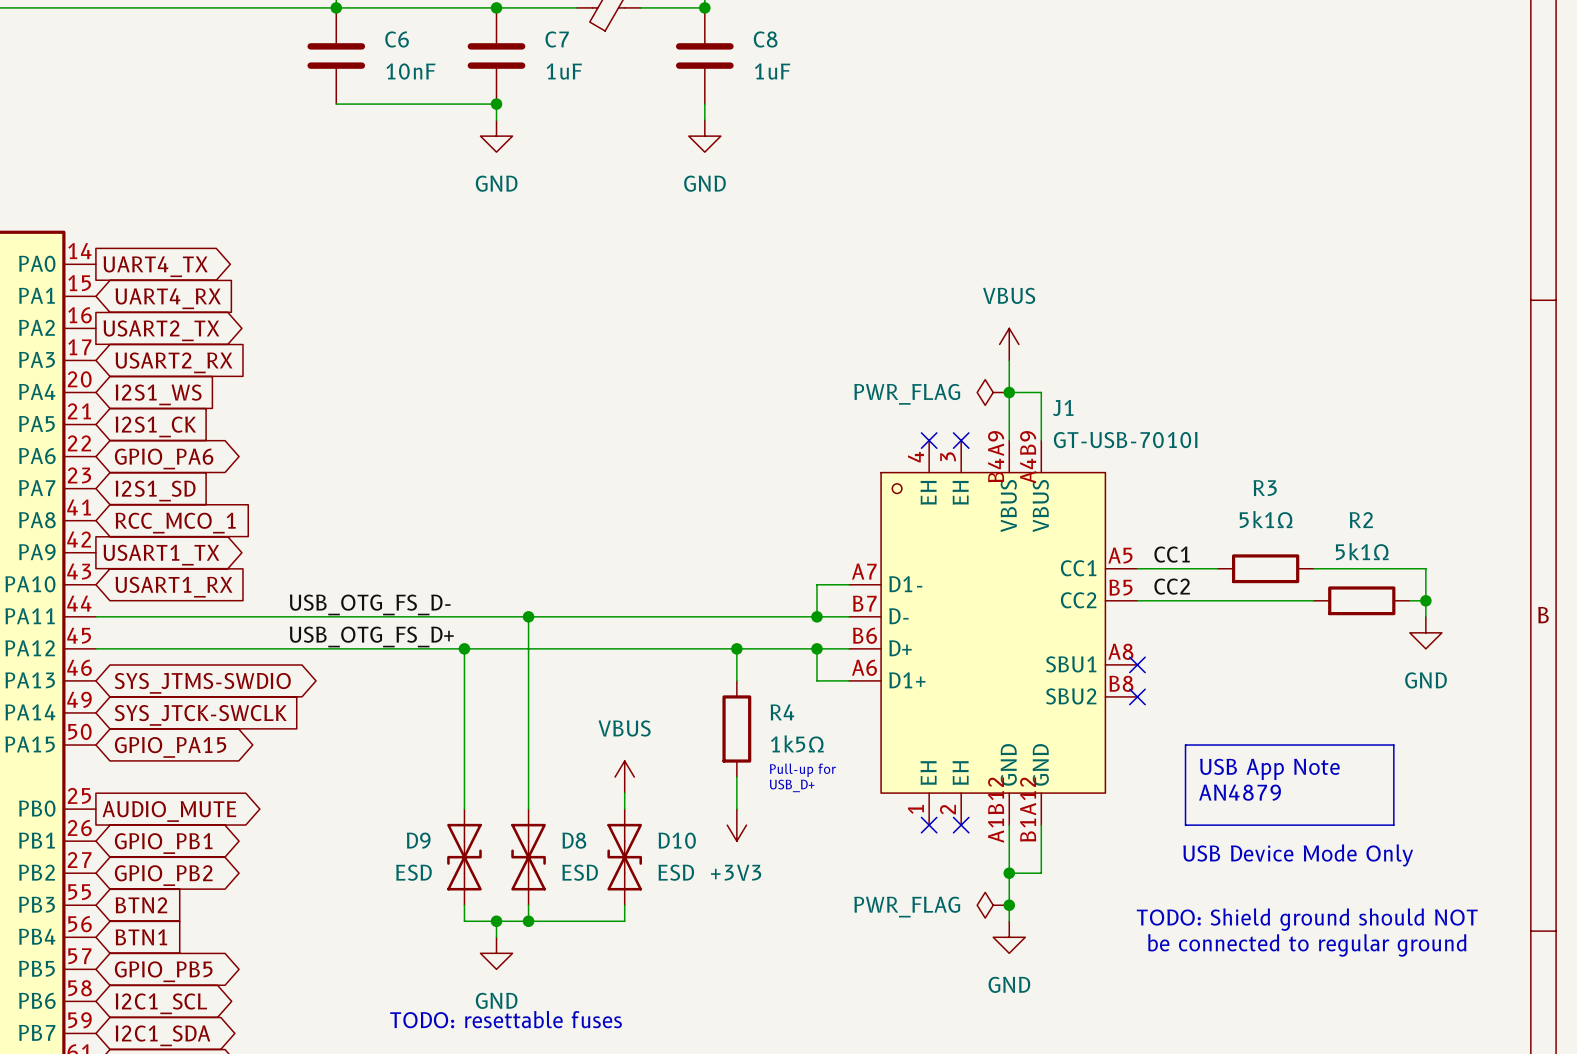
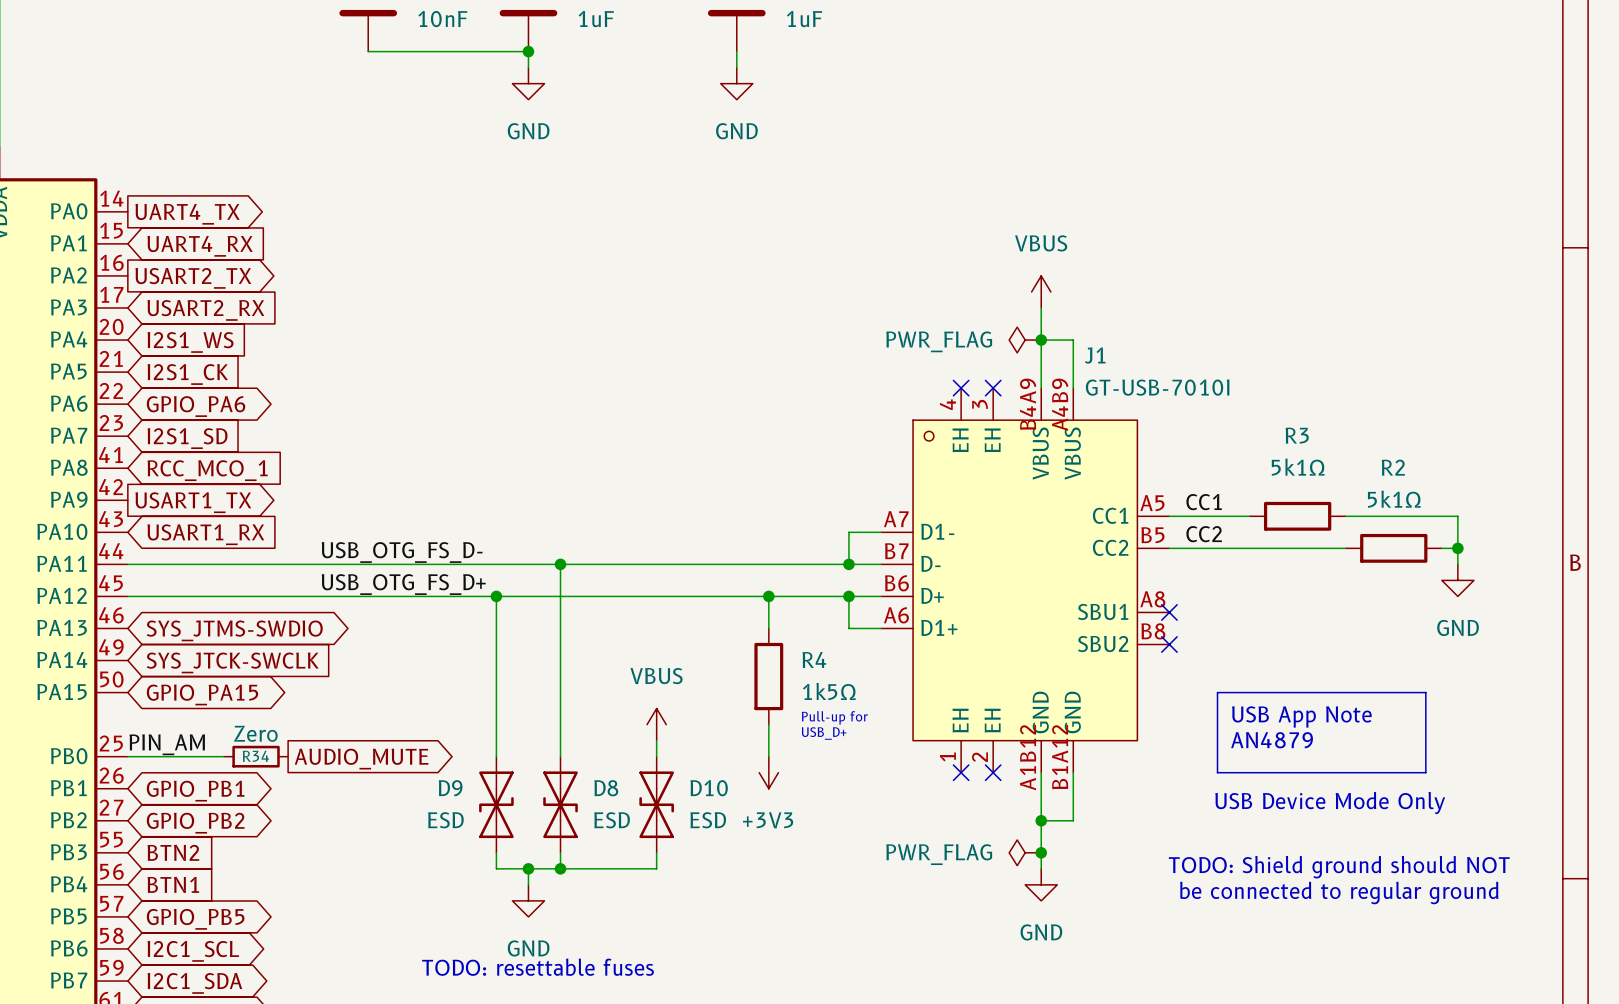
label: none -> PIN_AM (167, 744)
wire: none -> (127, 756) (224, 756)
R34: none -> Zero (256, 756)
global label position: AUDIO_MUTE (169, 811) -> AUDIO_MUTE (361, 759)

